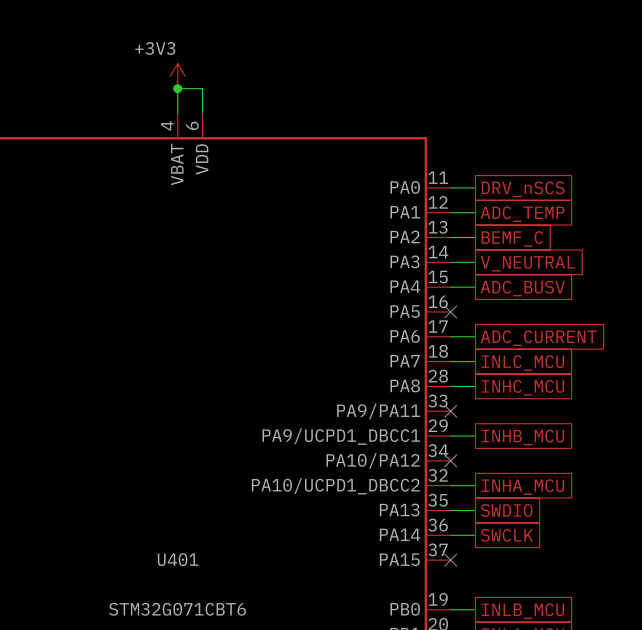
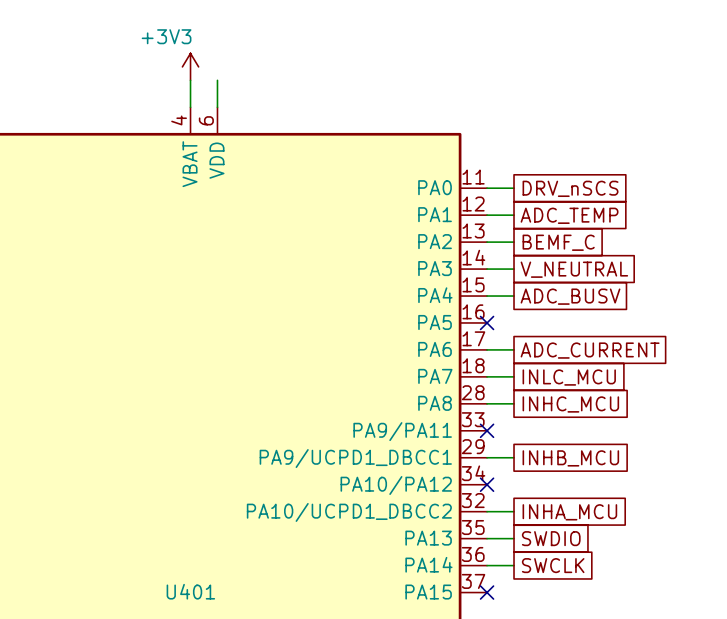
wire: (177, 88) (202, 88) -> none
junction: (177, 88) -> none

